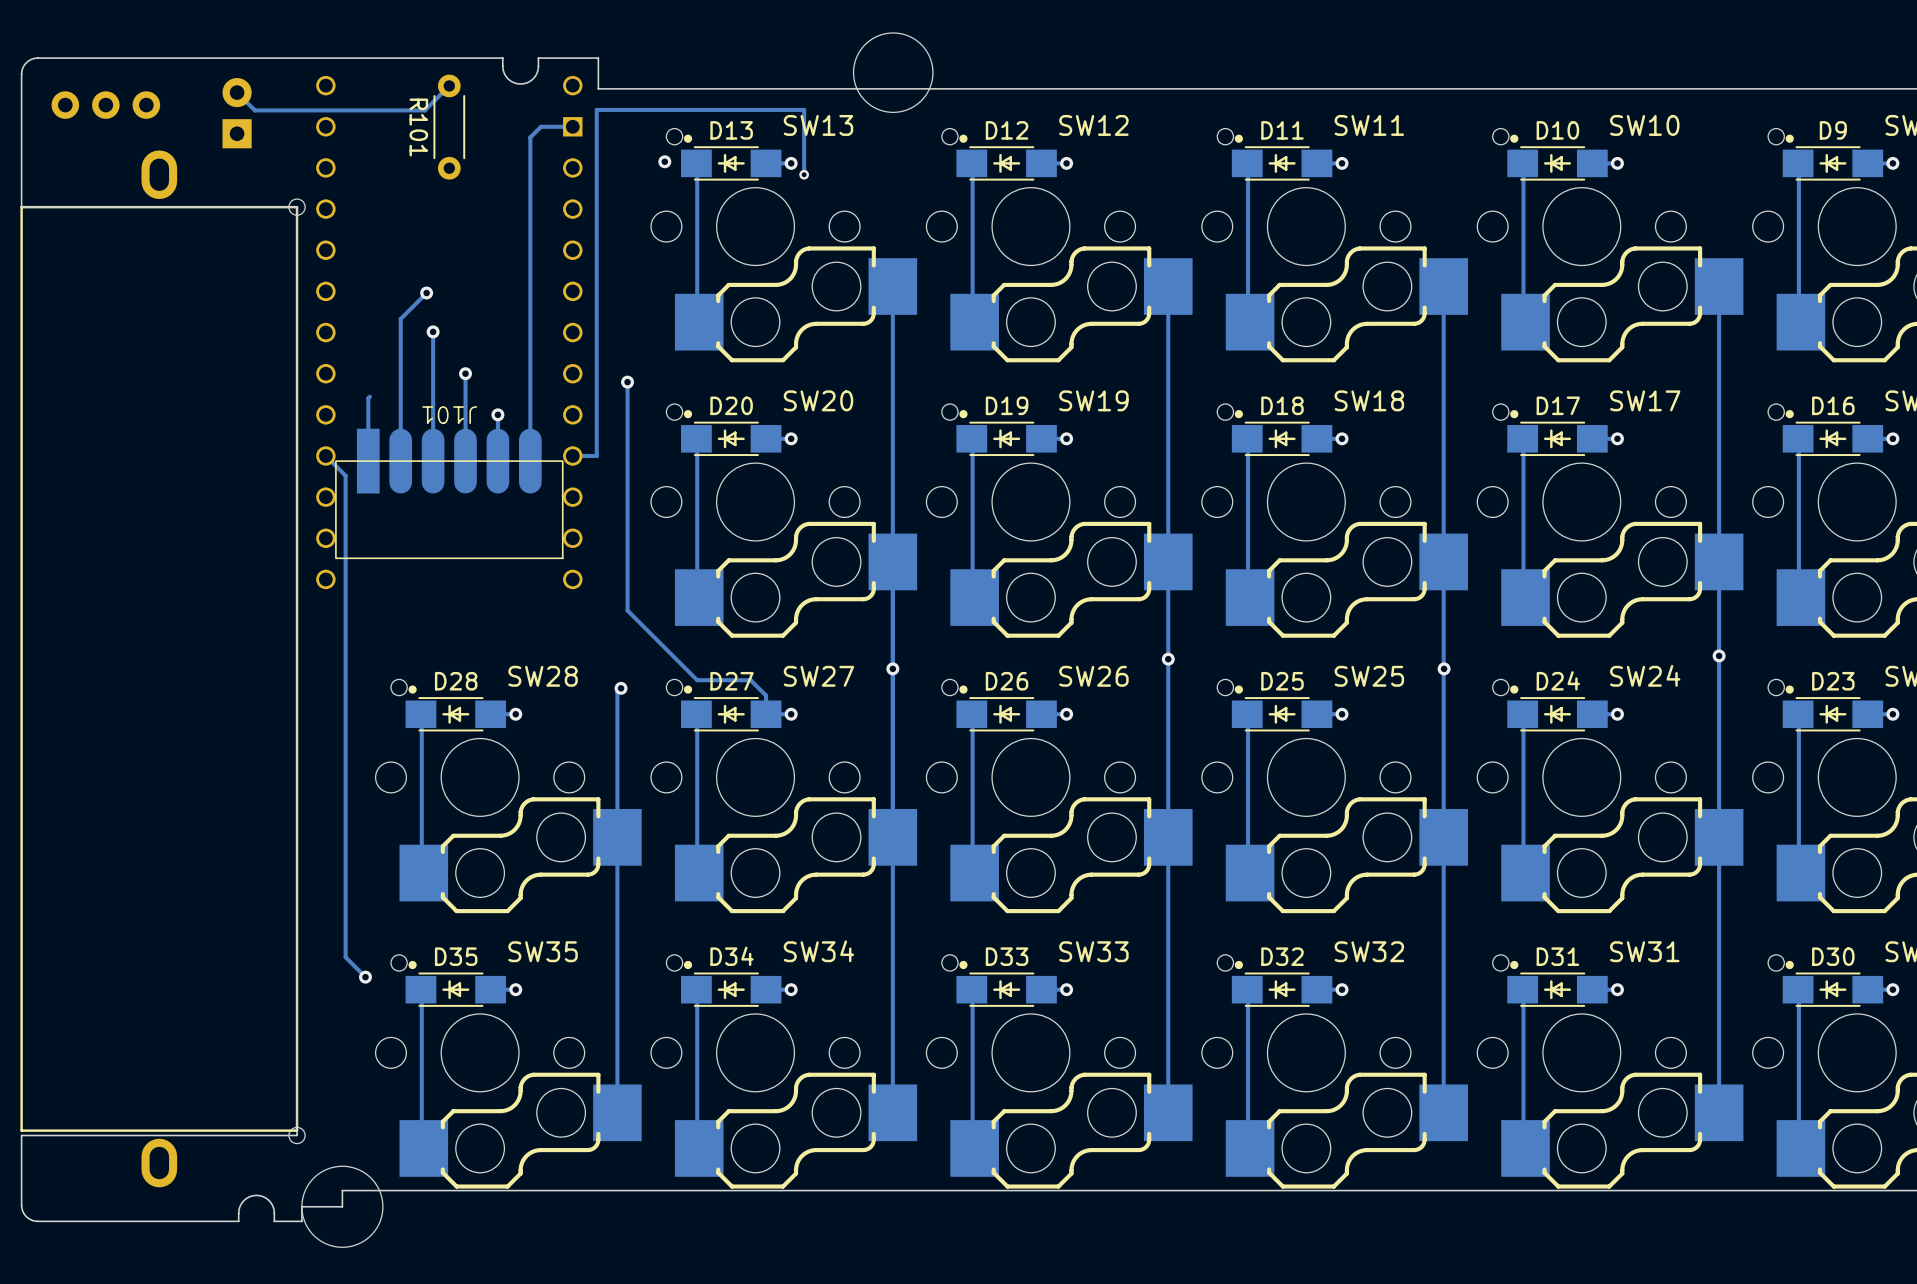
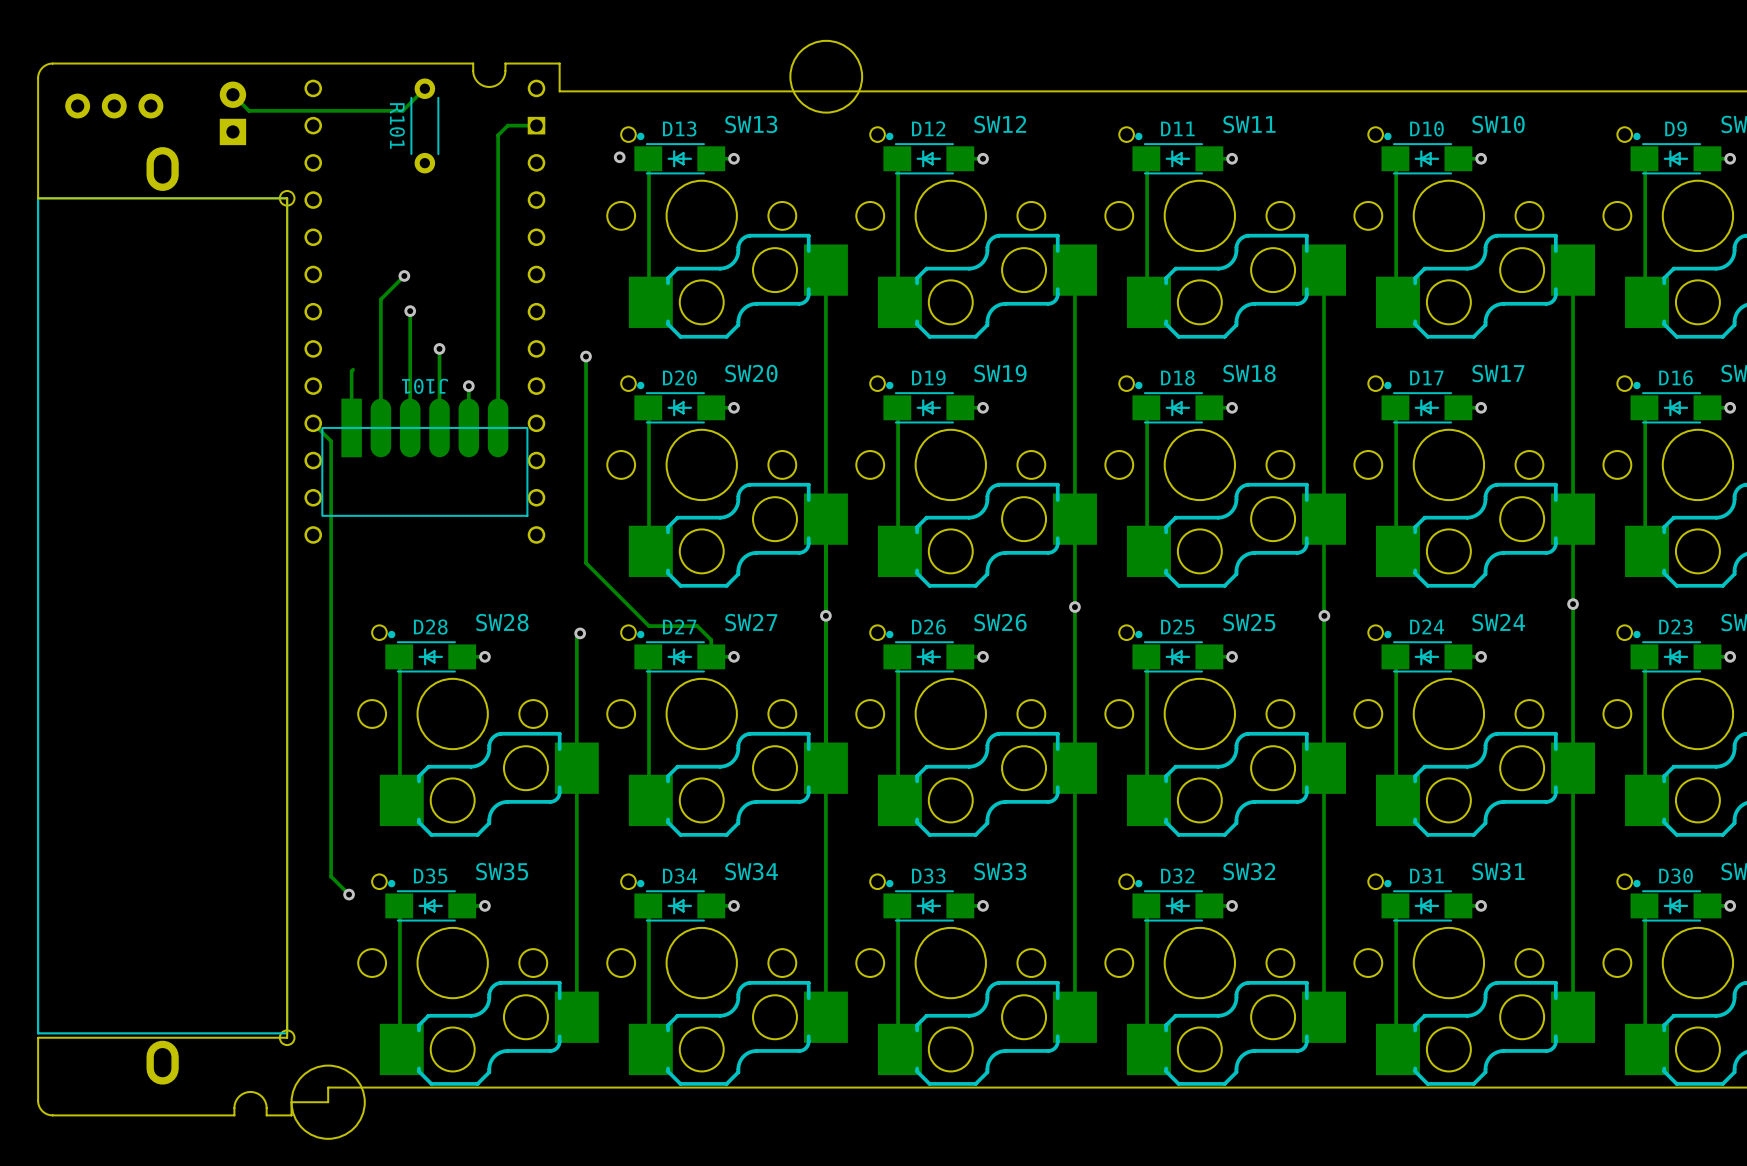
track: (804, 174) (804, 109) (596, 109) (596, 455) (572, 455) -> none
via: (804, 174) -> none

